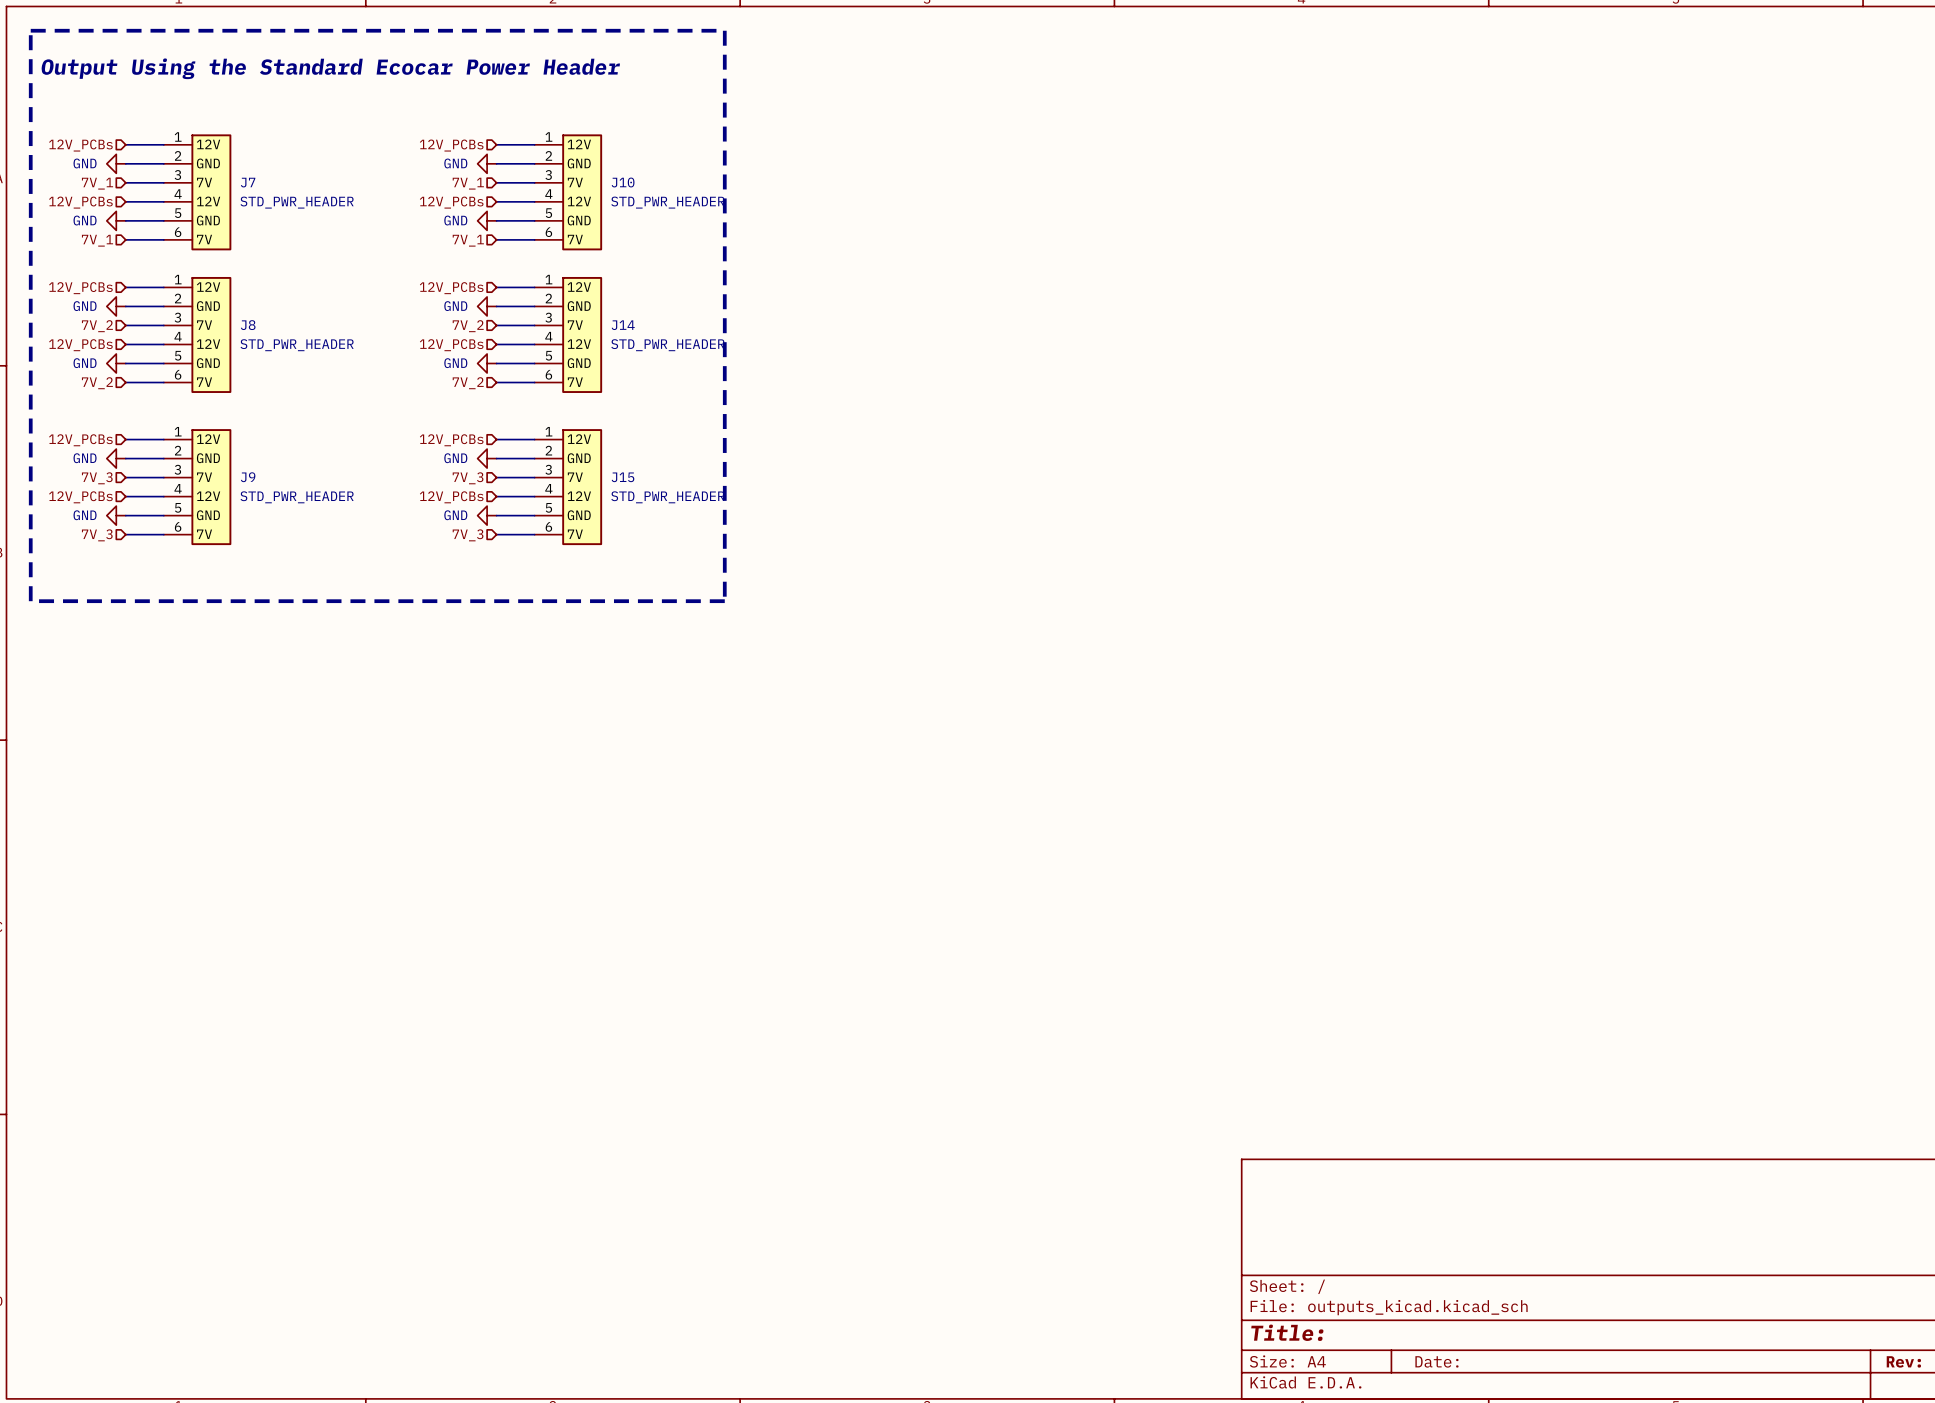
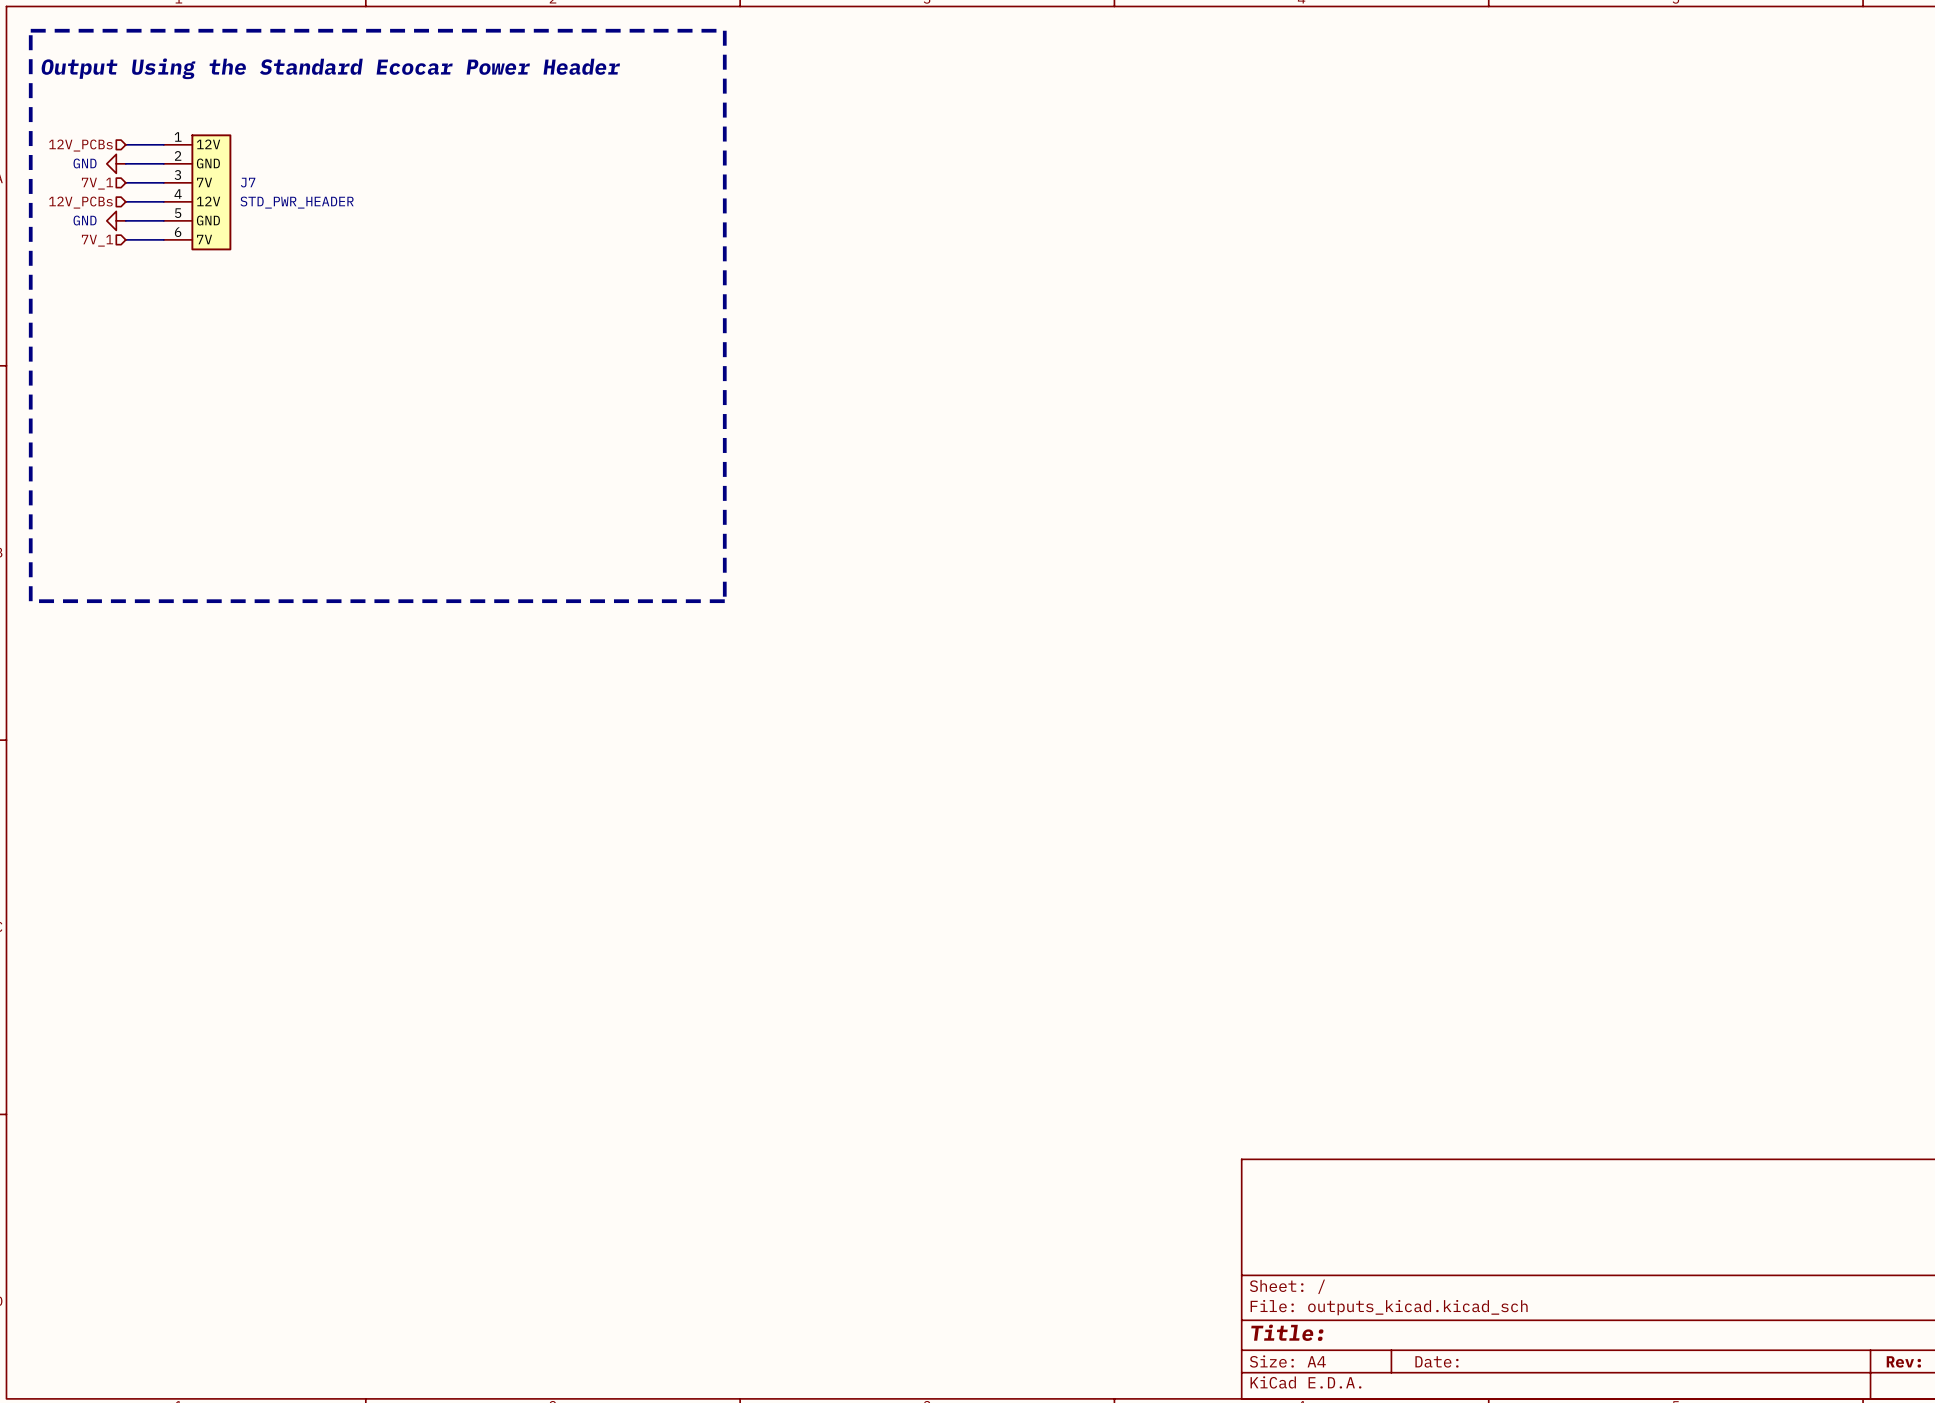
wire: (496, 144) (534, 144) -> none
hierarchical label: 12V_PCBs (451, 145) -> none
power symbol: GND (487, 163) -> none
wire: (496, 163) (534, 163) -> none
wire: (496, 182) (534, 182) -> none
hierarchical label: 7V_1 (468, 183) -> none
J10: STD_PWR_HEADER (568, 192) -> none
wire: (496, 201) (534, 201) -> none
hierarchical label: 12V_PCBs (451, 202) -> none
power symbol: GND (487, 220) -> none
wire: (496, 220) (534, 220) -> none
wire: (496, 239) (534, 239) -> none
hierarchical label: 7V_1 (468, 240) -> none
wire: (125, 287) (163, 287) -> none
wire: (496, 287) (534, 287) -> none
hierarchical label: 12V_PCBs (80, 288) -> none
hierarchical label: 12V_PCBs (451, 288) -> none
power symbol: GND (116, 306) -> none
wire: (125, 306) (163, 306) -> none
power symbol: GND (487, 306) -> none
wire: (496, 306) (534, 306) -> none
wire: (125, 325) (163, 325) -> none
wire: (496, 325) (534, 325) -> none
hierarchical label: 7V_2 (97, 326) -> none
hierarchical label: 7V_2 (468, 326) -> none
J8: STD_PWR_HEADER (197, 334) -> none
J14: STD_PWR_HEADER (568, 334) -> none
wire: (125, 344) (163, 344) -> none
wire: (496, 344) (534, 344) -> none
hierarchical label: 12V_PCBs (80, 345) -> none
hierarchical label: 12V_PCBs (451, 345) -> none
power symbol: GND (116, 363) -> none
wire: (125, 363) (163, 363) -> none
power symbol: GND (487, 363) -> none
wire: (496, 363) (534, 363) -> none
wire: (125, 382) (163, 382) -> none
wire: (496, 382) (534, 382) -> none
hierarchical label: 7V_2 (97, 383) -> none
hierarchical label: 7V_2 (468, 383) -> none
wire: (125, 439) (163, 439) -> none
wire: (496, 439) (534, 439) -> none
hierarchical label: 12V_PCBs (80, 440) -> none
hierarchical label: 12V_PCBs (451, 440) -> none
power symbol: GND (116, 458) -> none
wire: (125, 458) (163, 458) -> none
power symbol: GND (487, 458) -> none
wire: (496, 458) (534, 458) -> none
wire: (125, 477) (163, 477) -> none
wire: (496, 477) (534, 477) -> none
hierarchical label: 7V_3 (97, 478) -> none
hierarchical label: 7V_3 (468, 478) -> none
J9: STD_PWR_HEADER (197, 487) -> none
J15: STD_PWR_HEADER (568, 487) -> none
wire: (125, 496) (163, 496) -> none
wire: (496, 496) (534, 496) -> none
hierarchical label: 12V_PCBs (80, 497) -> none
hierarchical label: 12V_PCBs (451, 497) -> none
power symbol: GND (116, 515) -> none
wire: (125, 515) (163, 515) -> none
power symbol: GND (487, 515) -> none
wire: (496, 515) (534, 515) -> none
wire: (125, 534) (163, 534) -> none
wire: (496, 534) (534, 534) -> none
hierarchical label: 7V_3 (97, 535) -> none
hierarchical label: 7V_3 (468, 535) -> none

